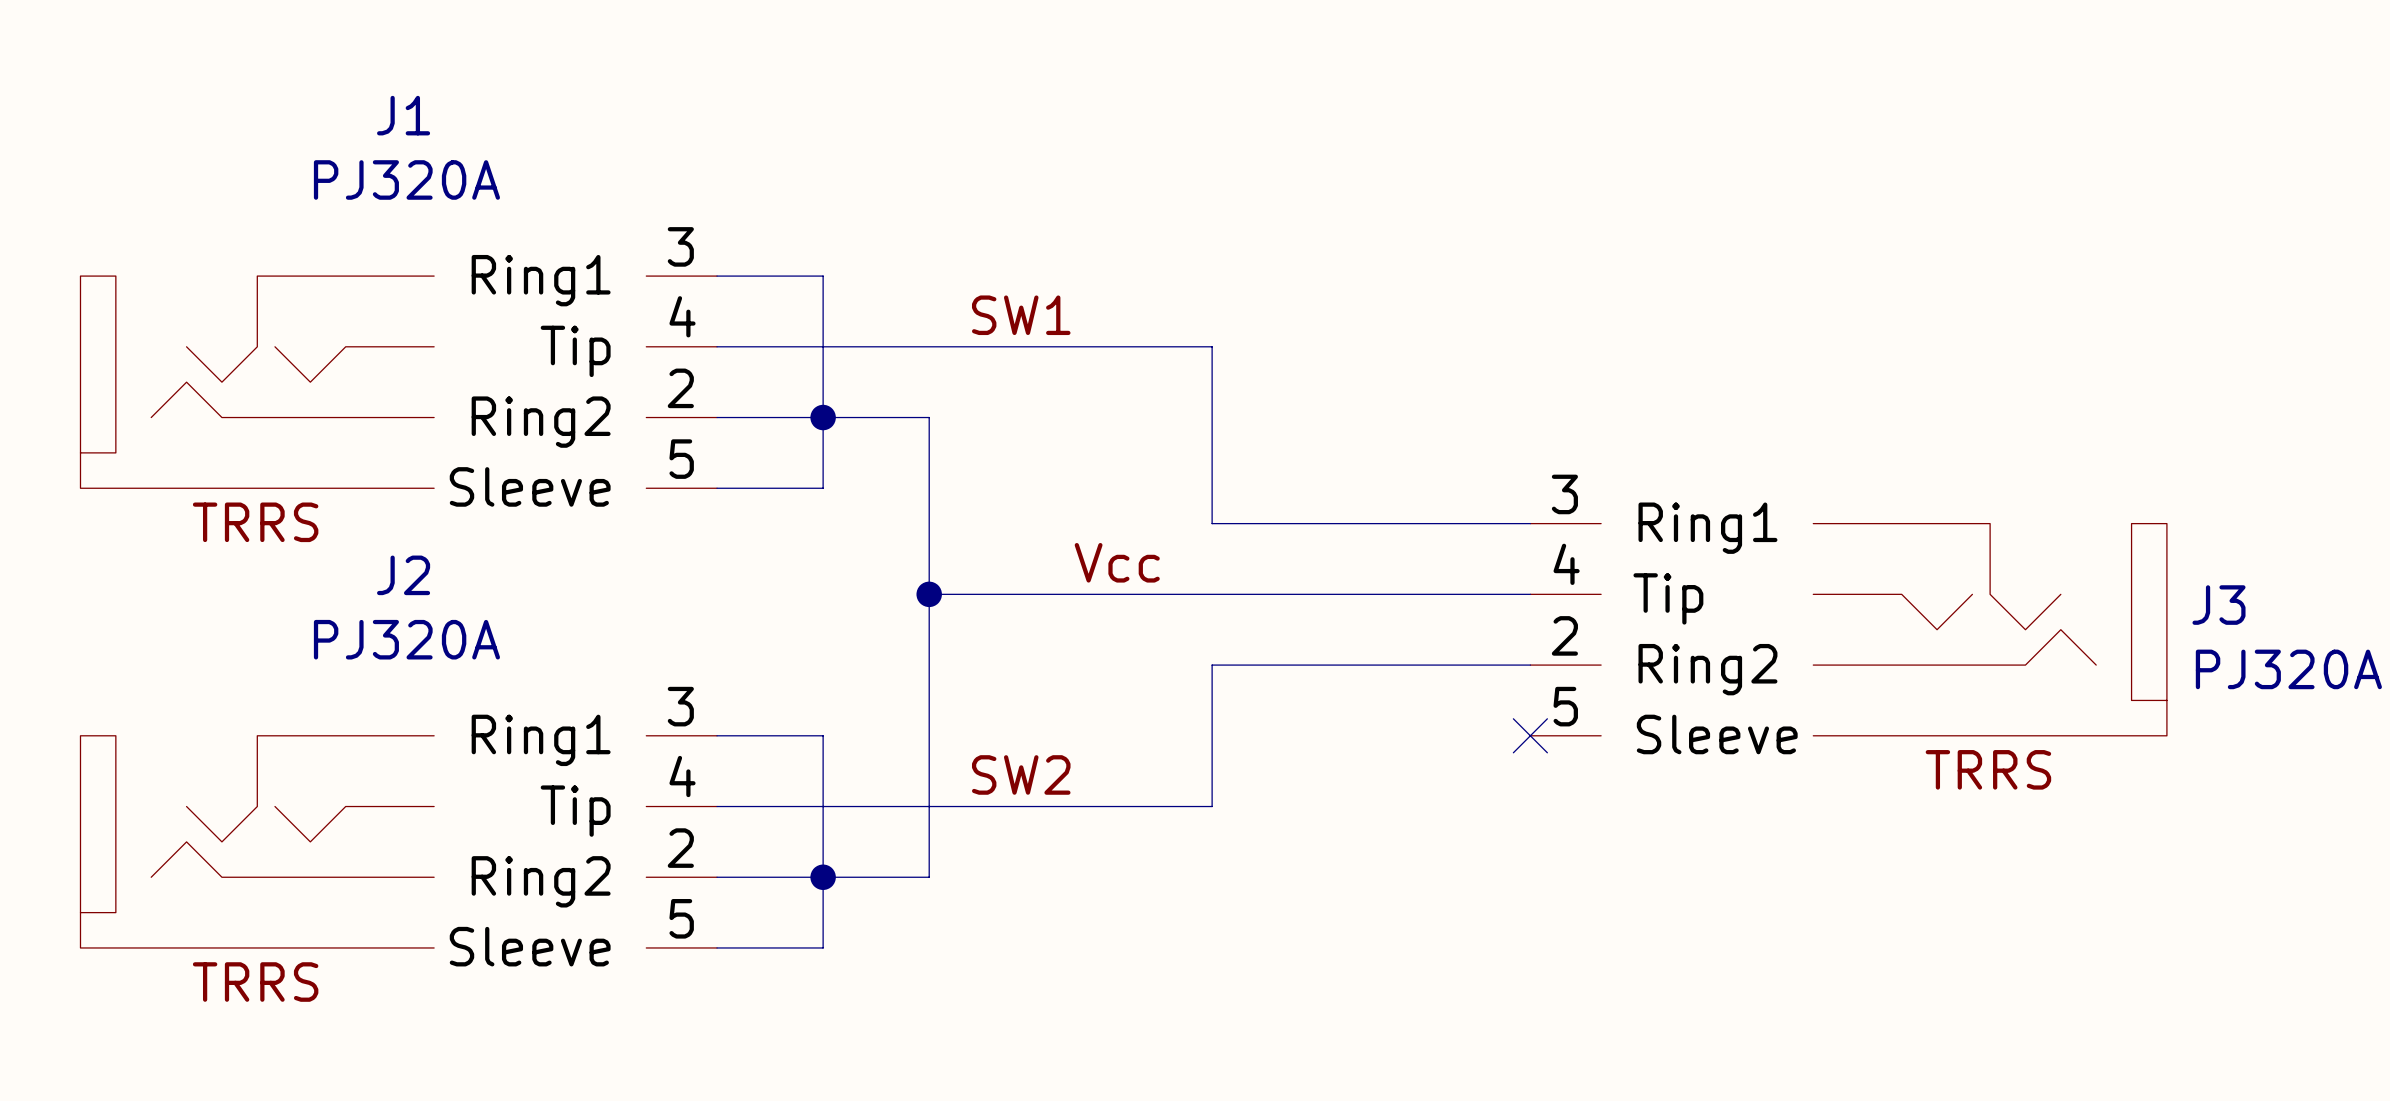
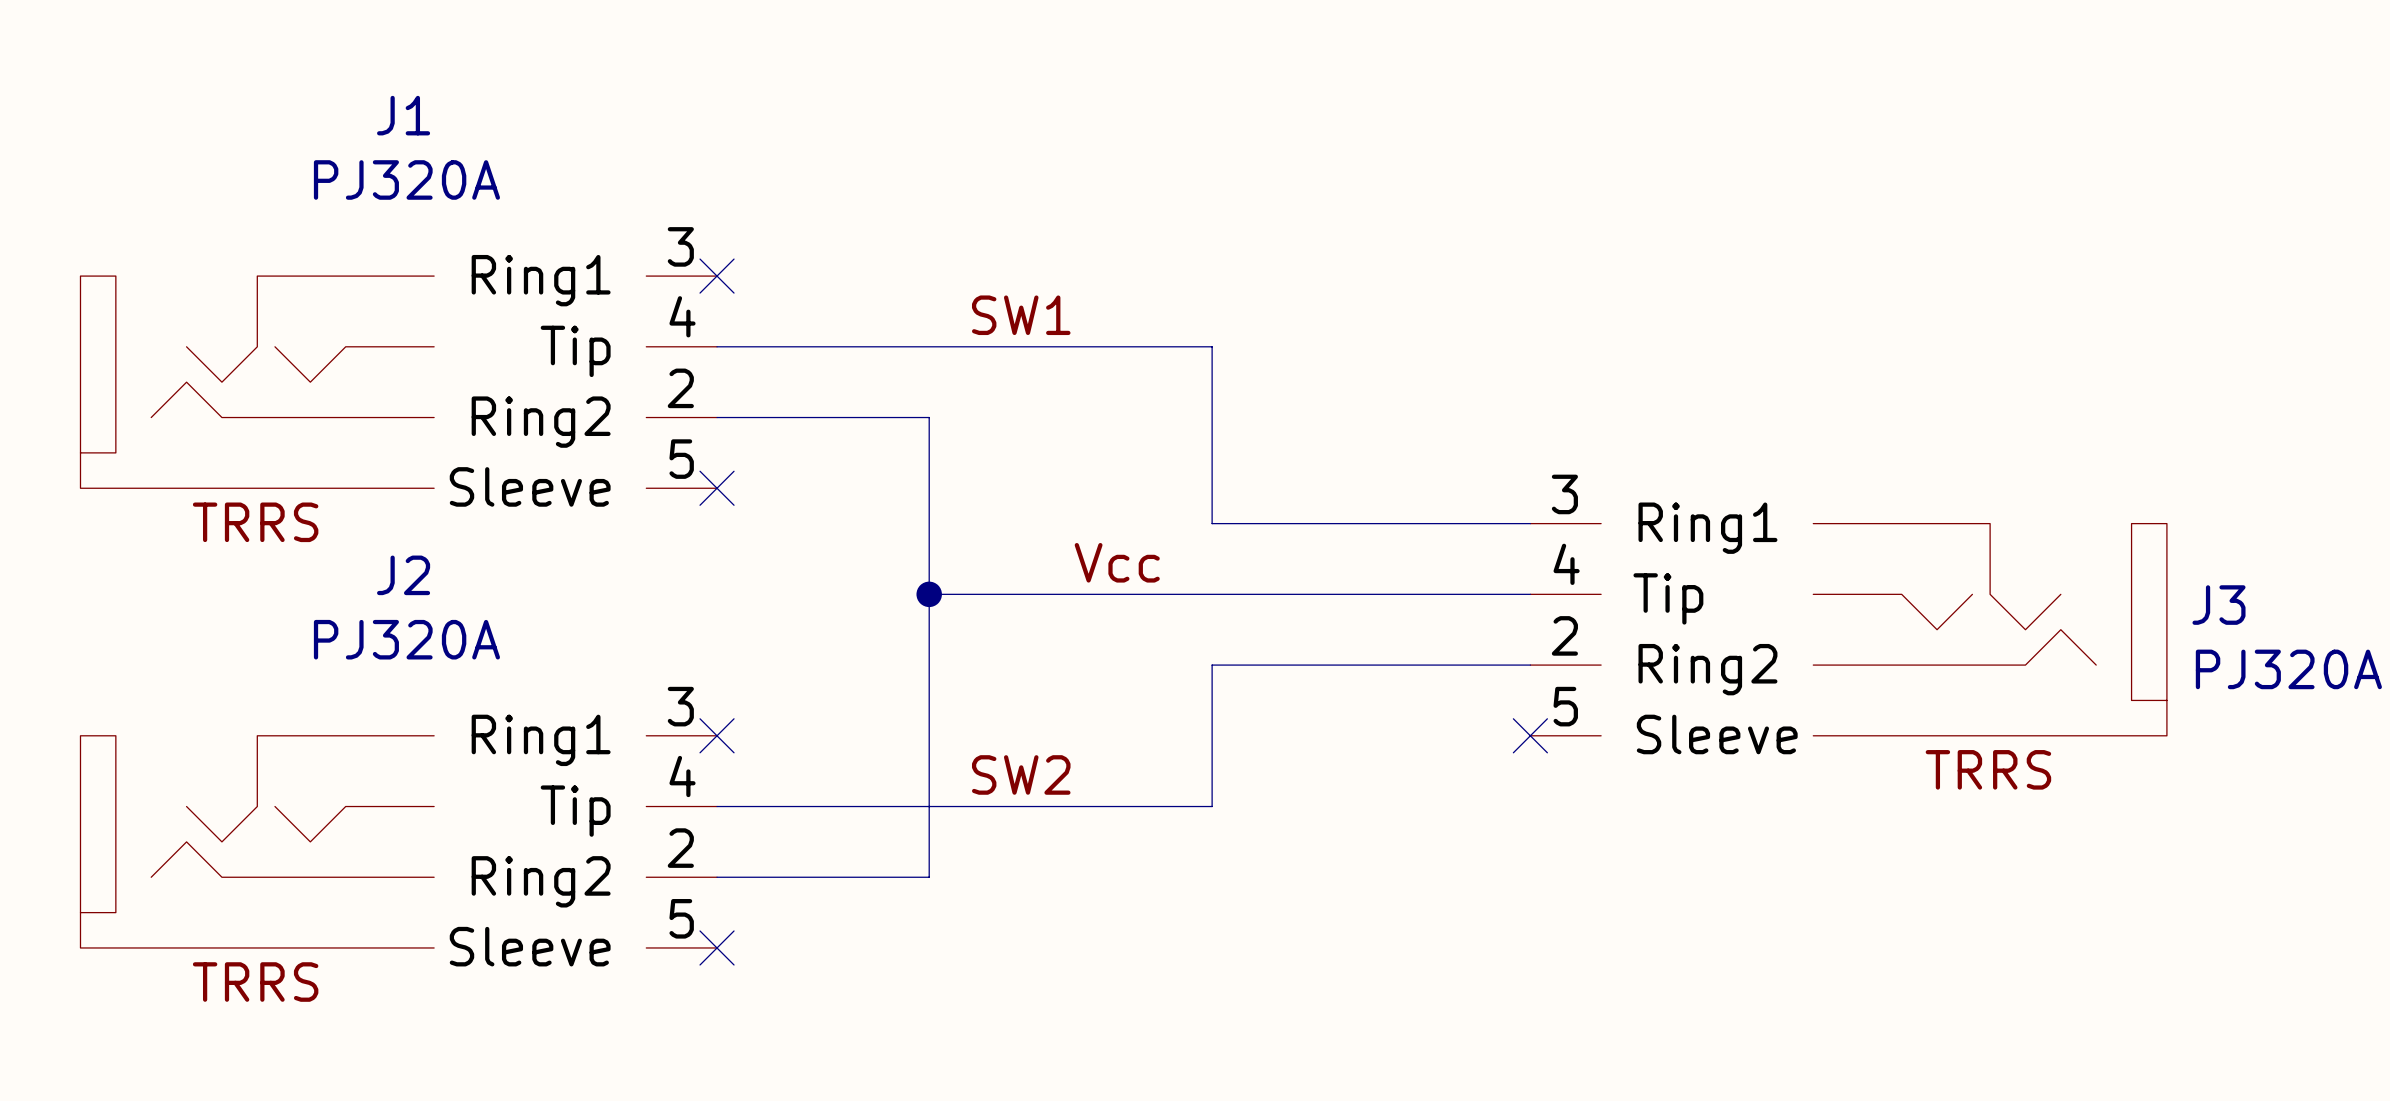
wire: (717, 276) (823, 276) (823, 488) (717, 488) -> none
no-connect mark: none -> (717, 276)
junction: (823, 417) -> none
no-connect mark: none -> (717, 488)
wire: (717, 735) (823, 735) (823, 947) (717, 947) -> none
no-connect mark: none -> (717, 735)
junction: (823, 877) -> none
no-connect mark: none -> (717, 947)

